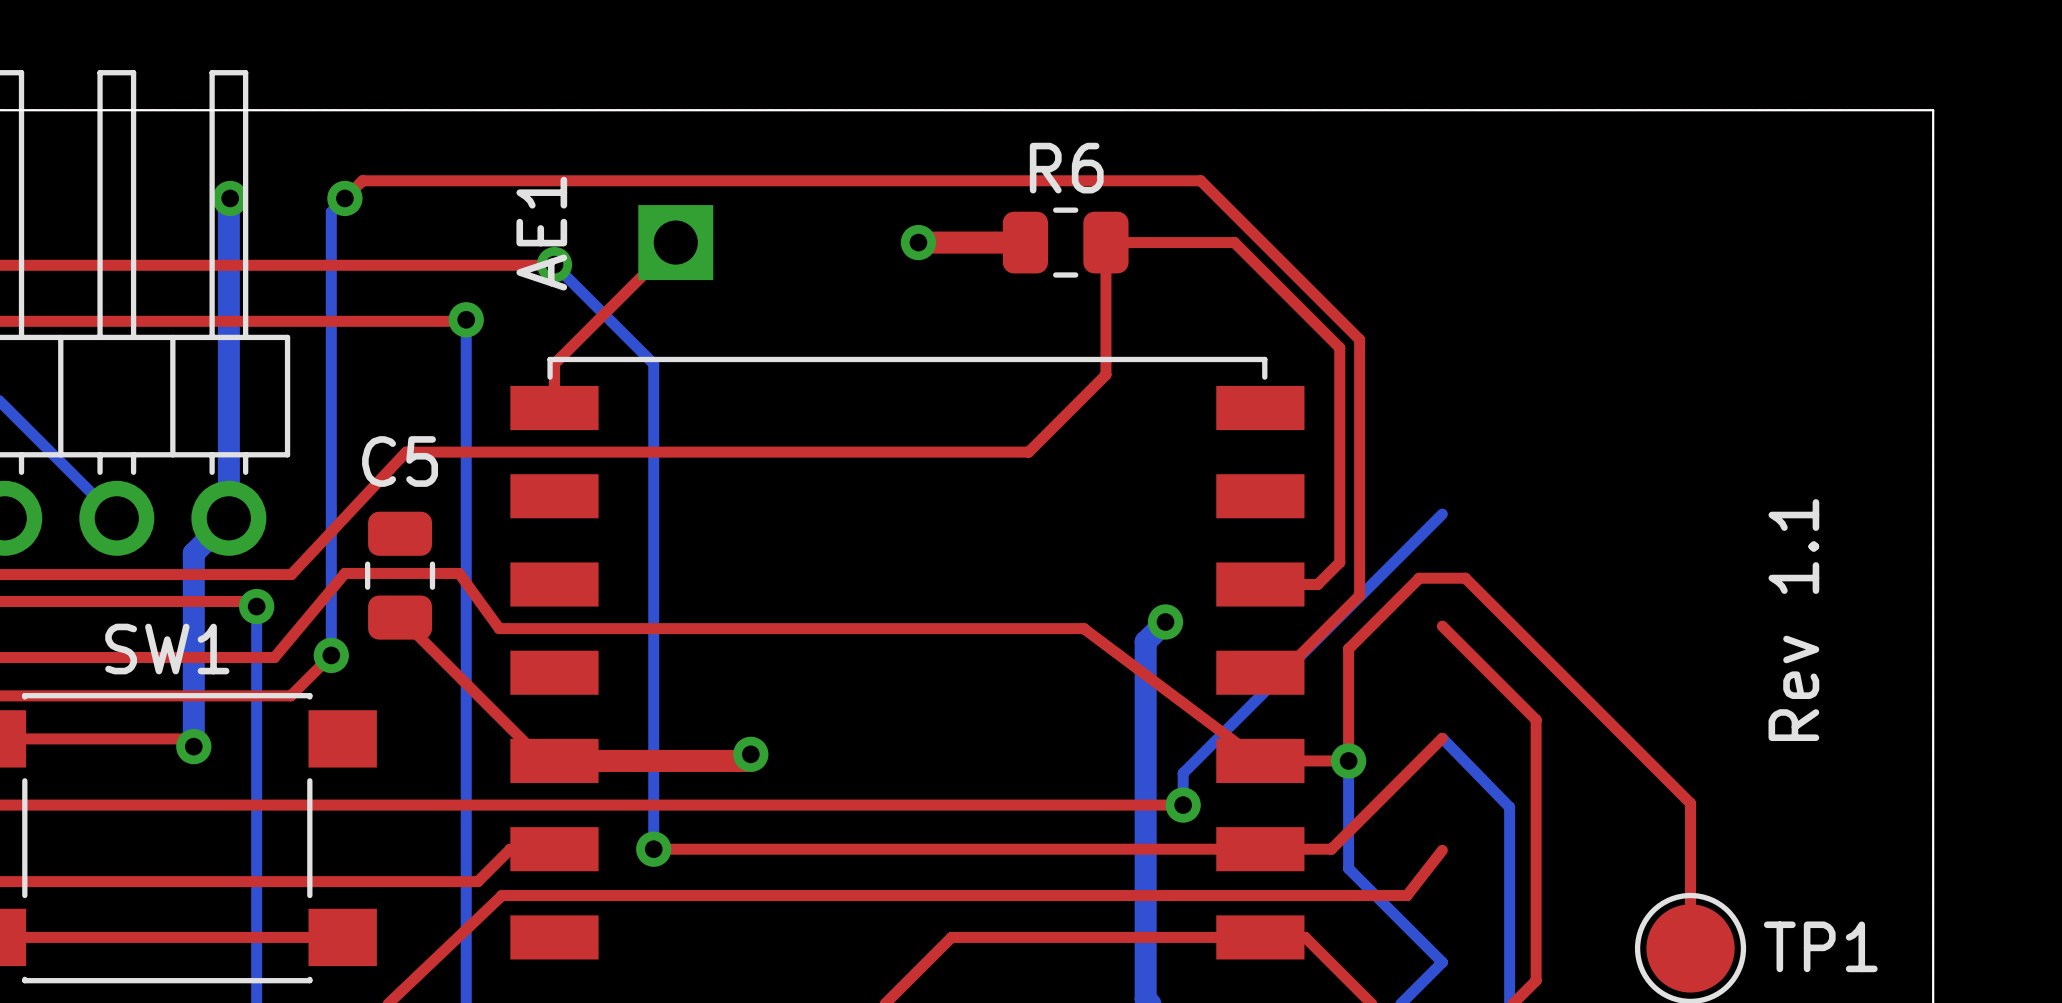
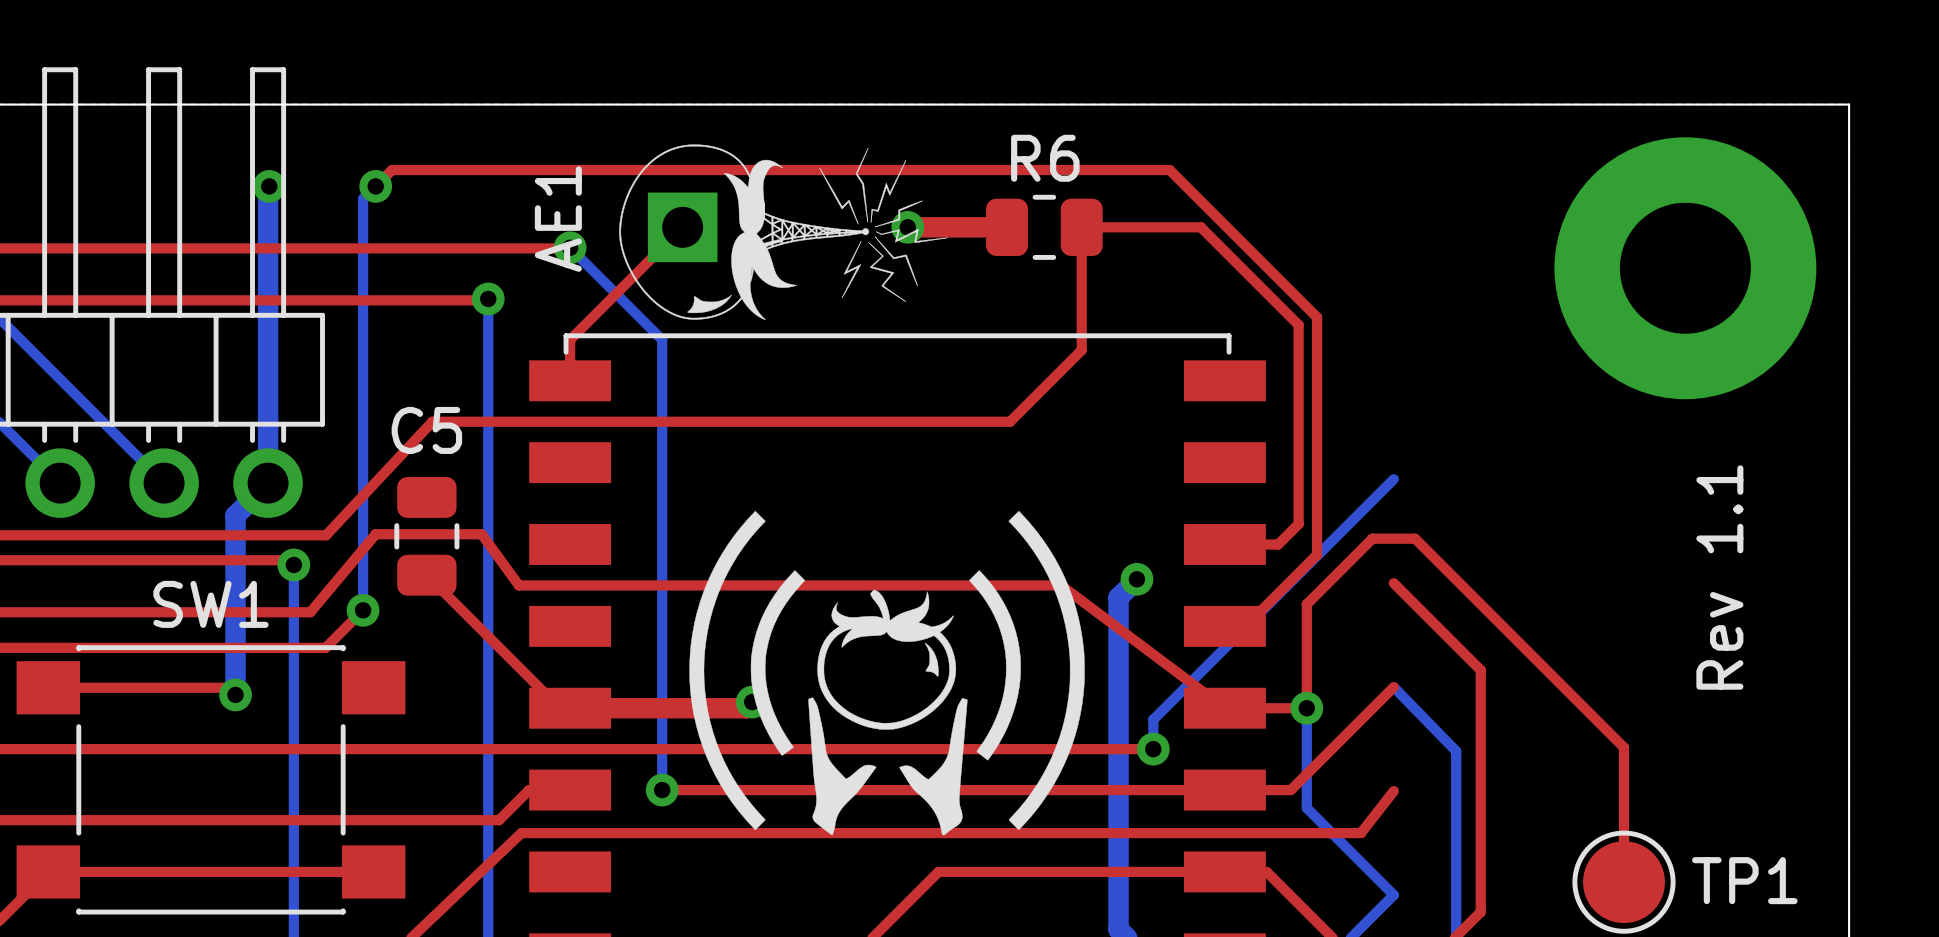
drawing: none -> [619, 144, 948, 321]
part: none -> (1685, 268)
drawing: none -> [689, 510, 1085, 836]

